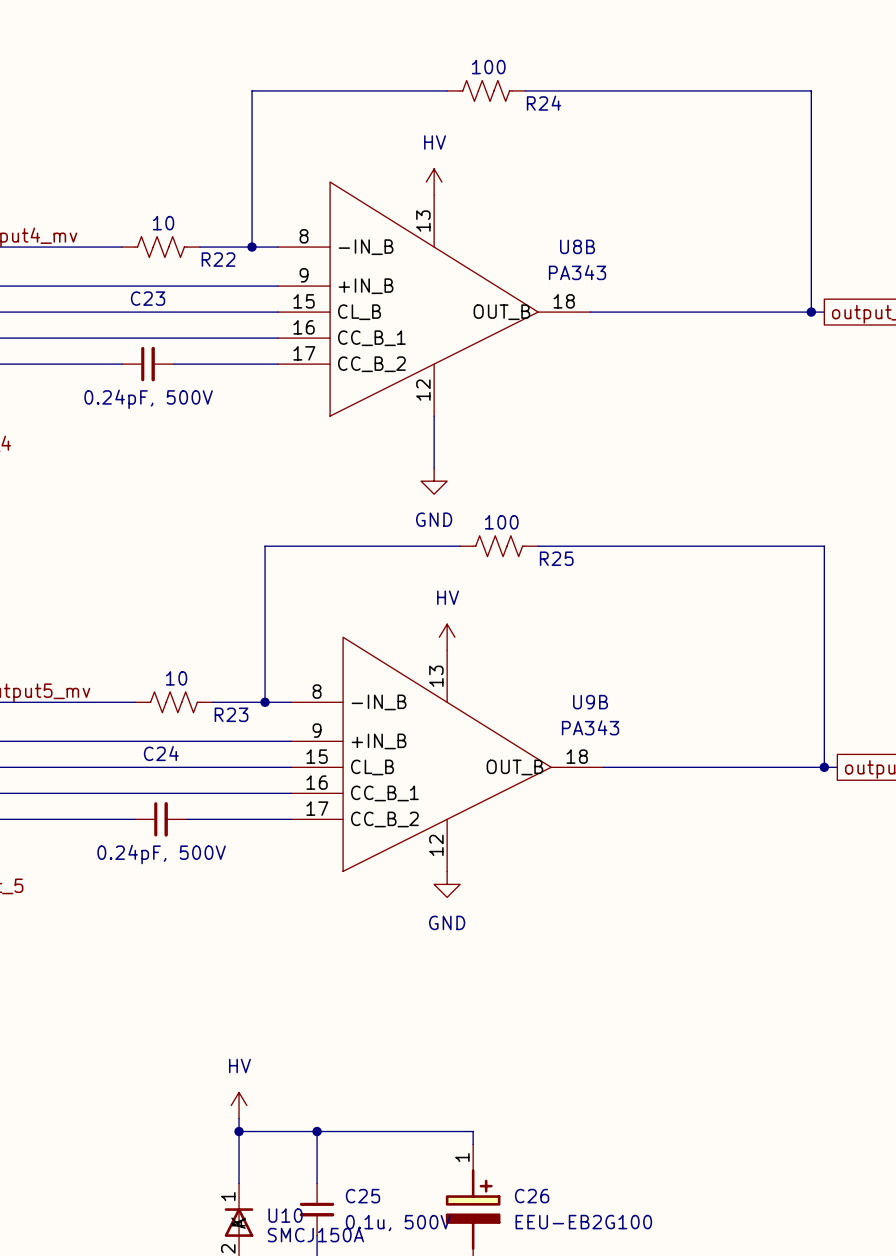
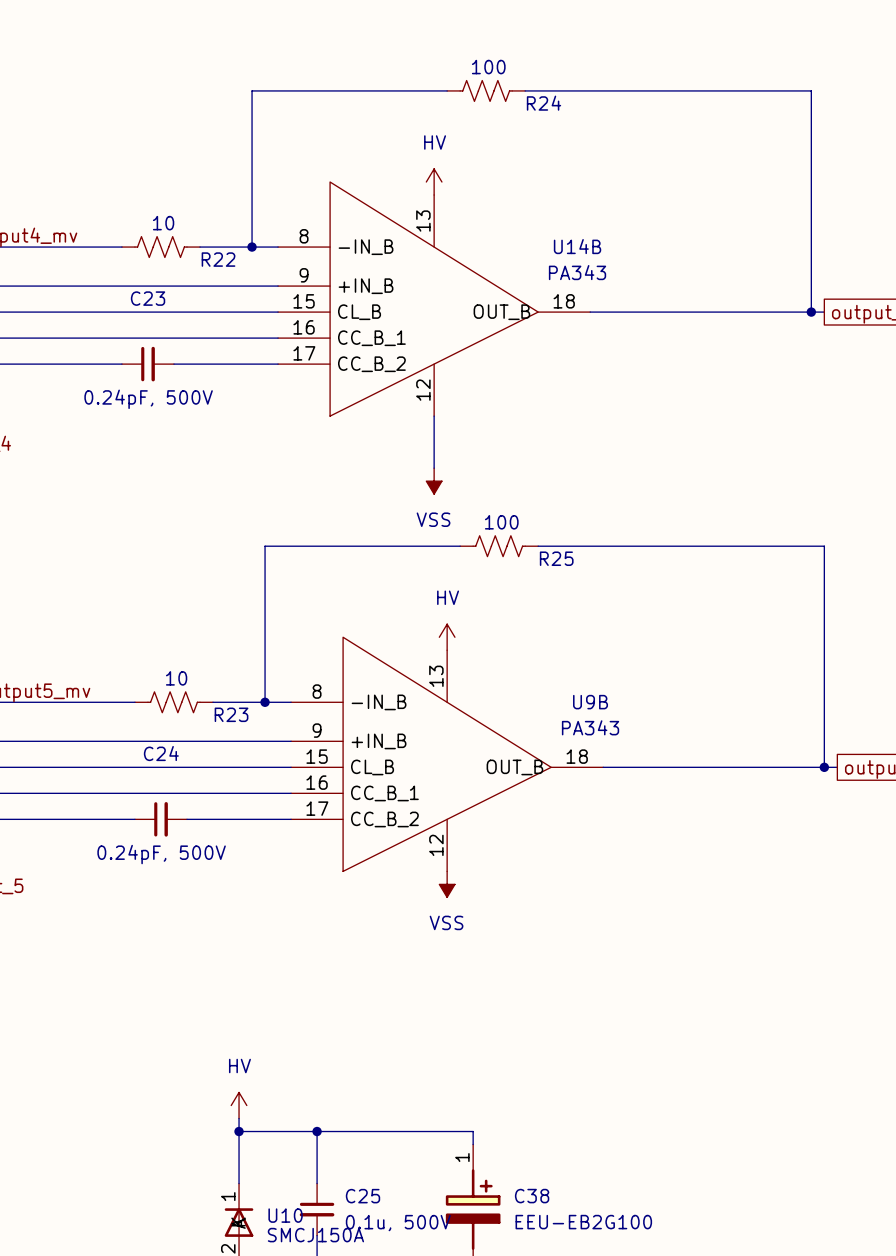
U8B name: U8B (577, 246) -> U14B (577, 246)
power symbol: GND (434, 481) -> VSS (434, 481)
power symbol: GND (447, 884) -> VSS (447, 884)
C26 name: C26 (532, 1196) -> C38 (532, 1196)

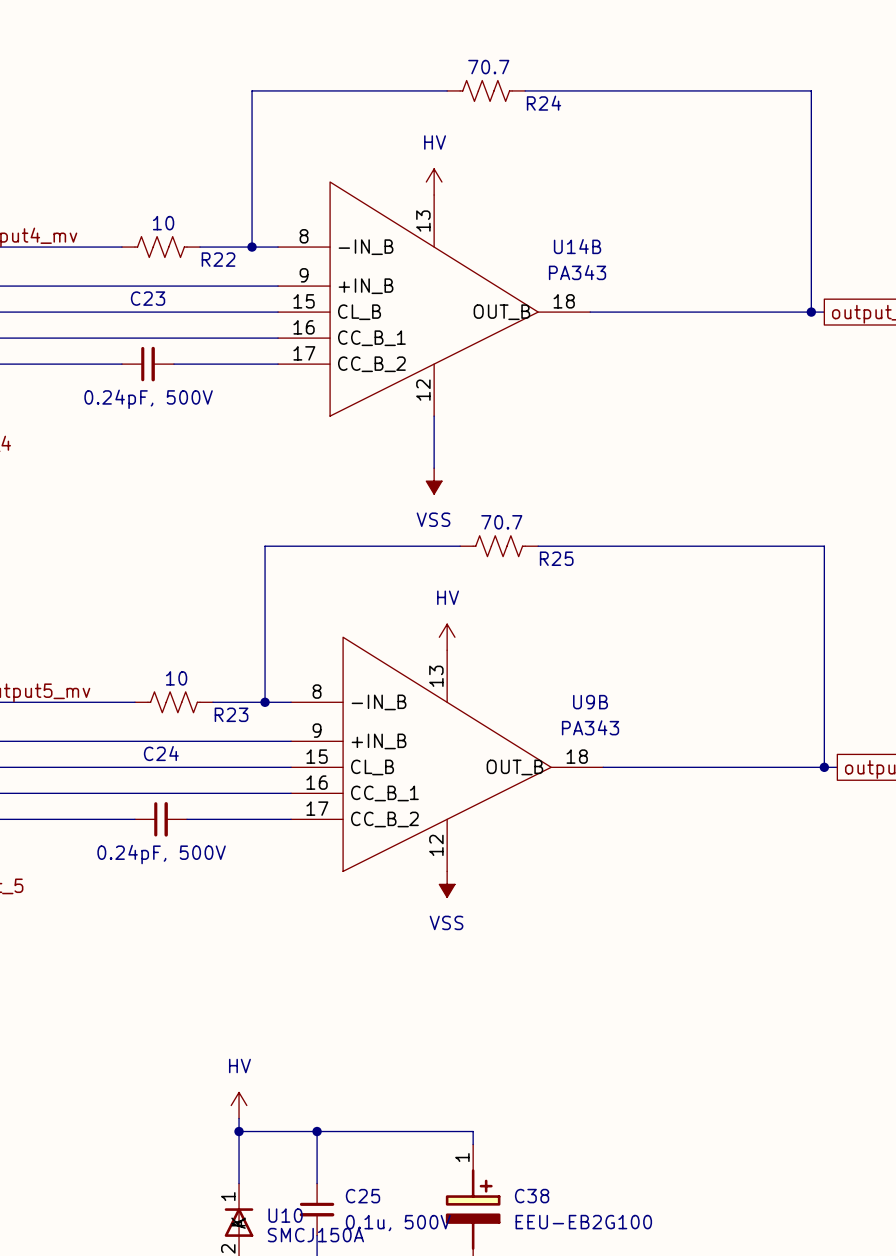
R24 value: 100 (488, 67) -> 70.7 (488, 67)
R25 value: 100 (501, 522) -> 70.7 (501, 522)

